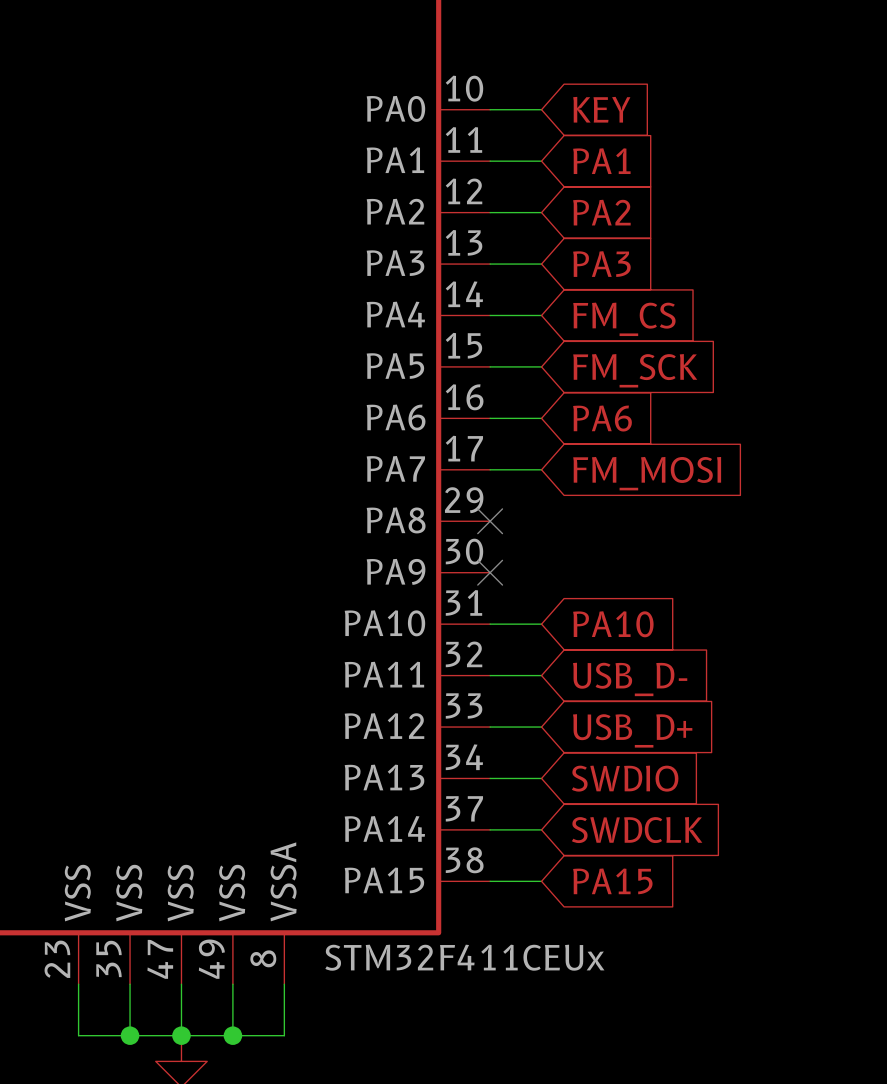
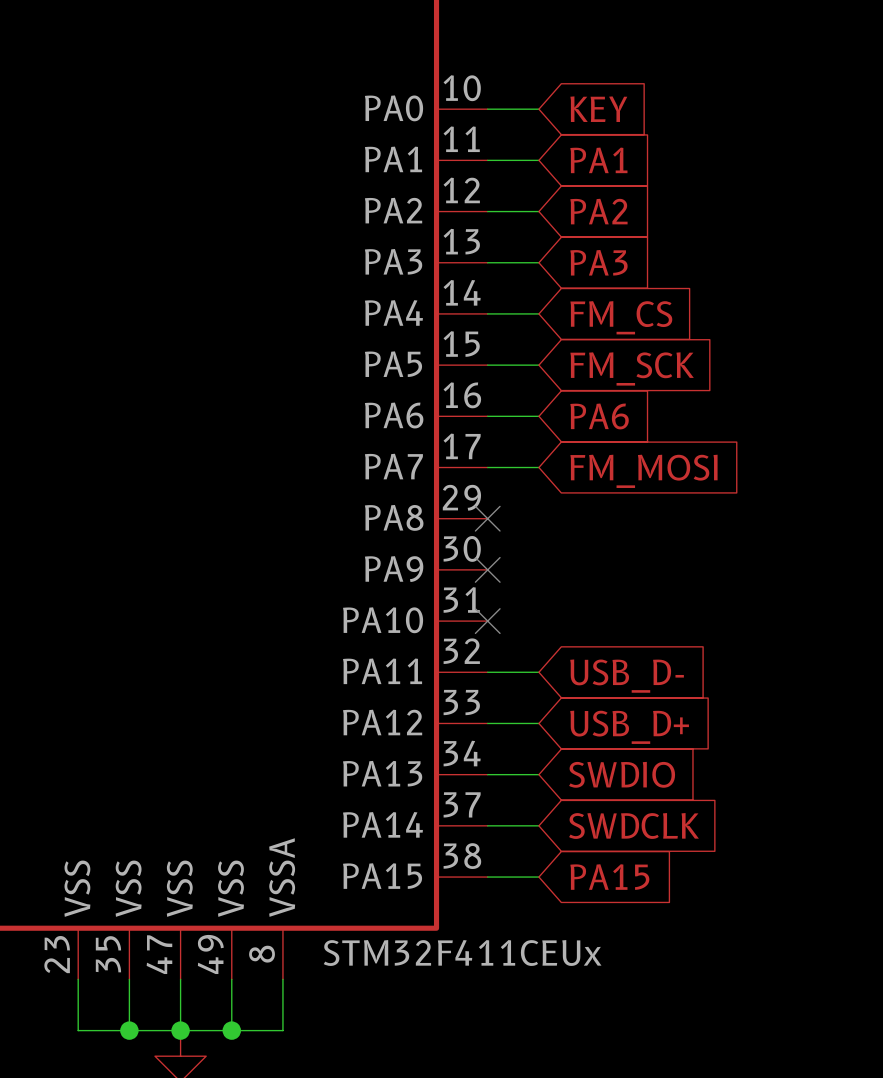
wire: (490, 624) (541, 624) -> none
no-connect mark: none -> (487, 621)
global label: PA10 (613, 624) -> none

